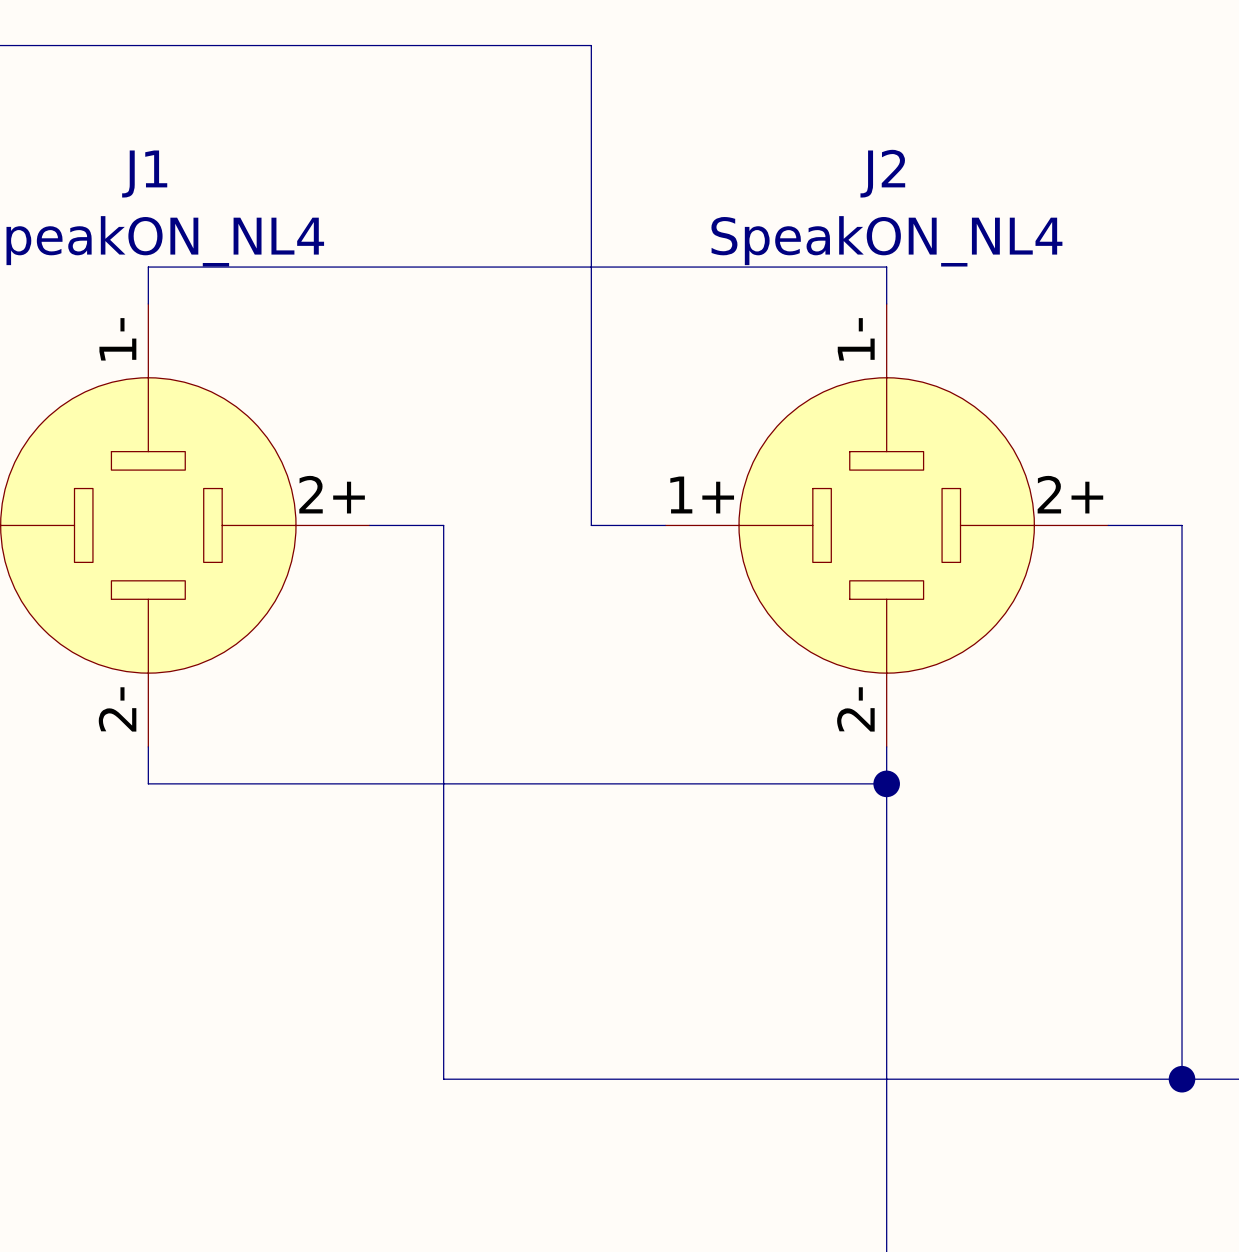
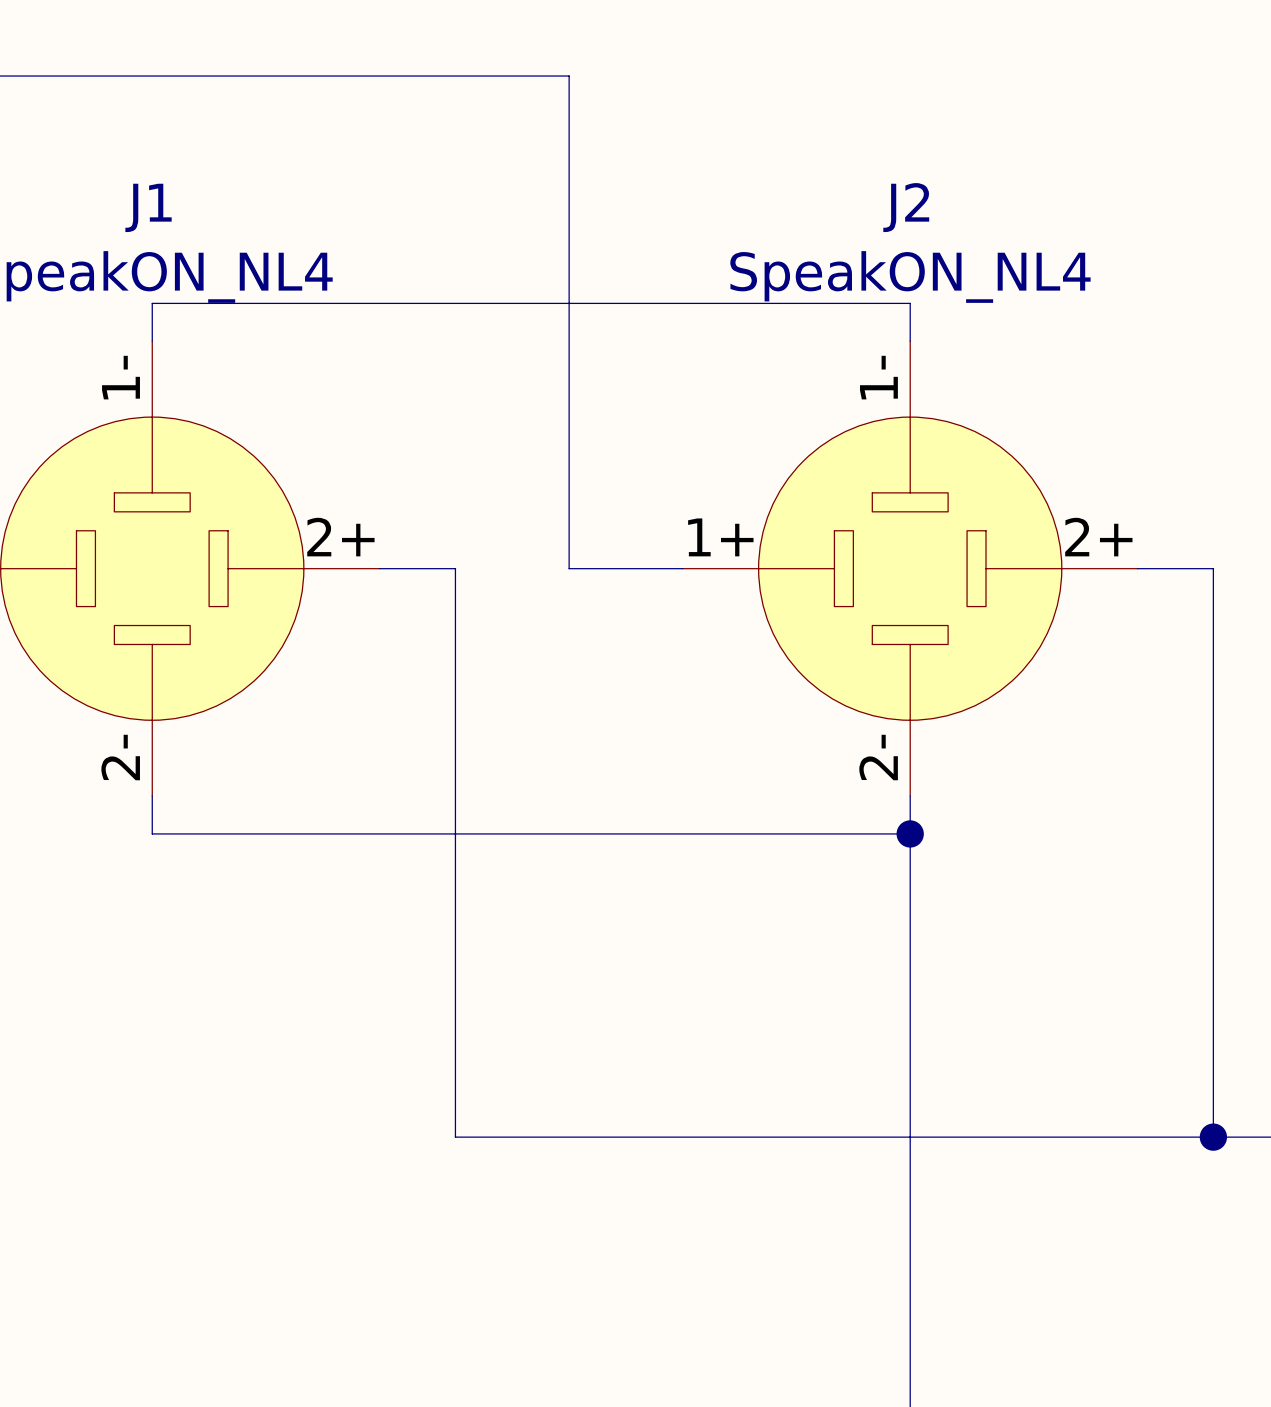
wire: (554, 45) (591, 45) (591, 525) -> (569, 76) (569, 568) (607, 568)

